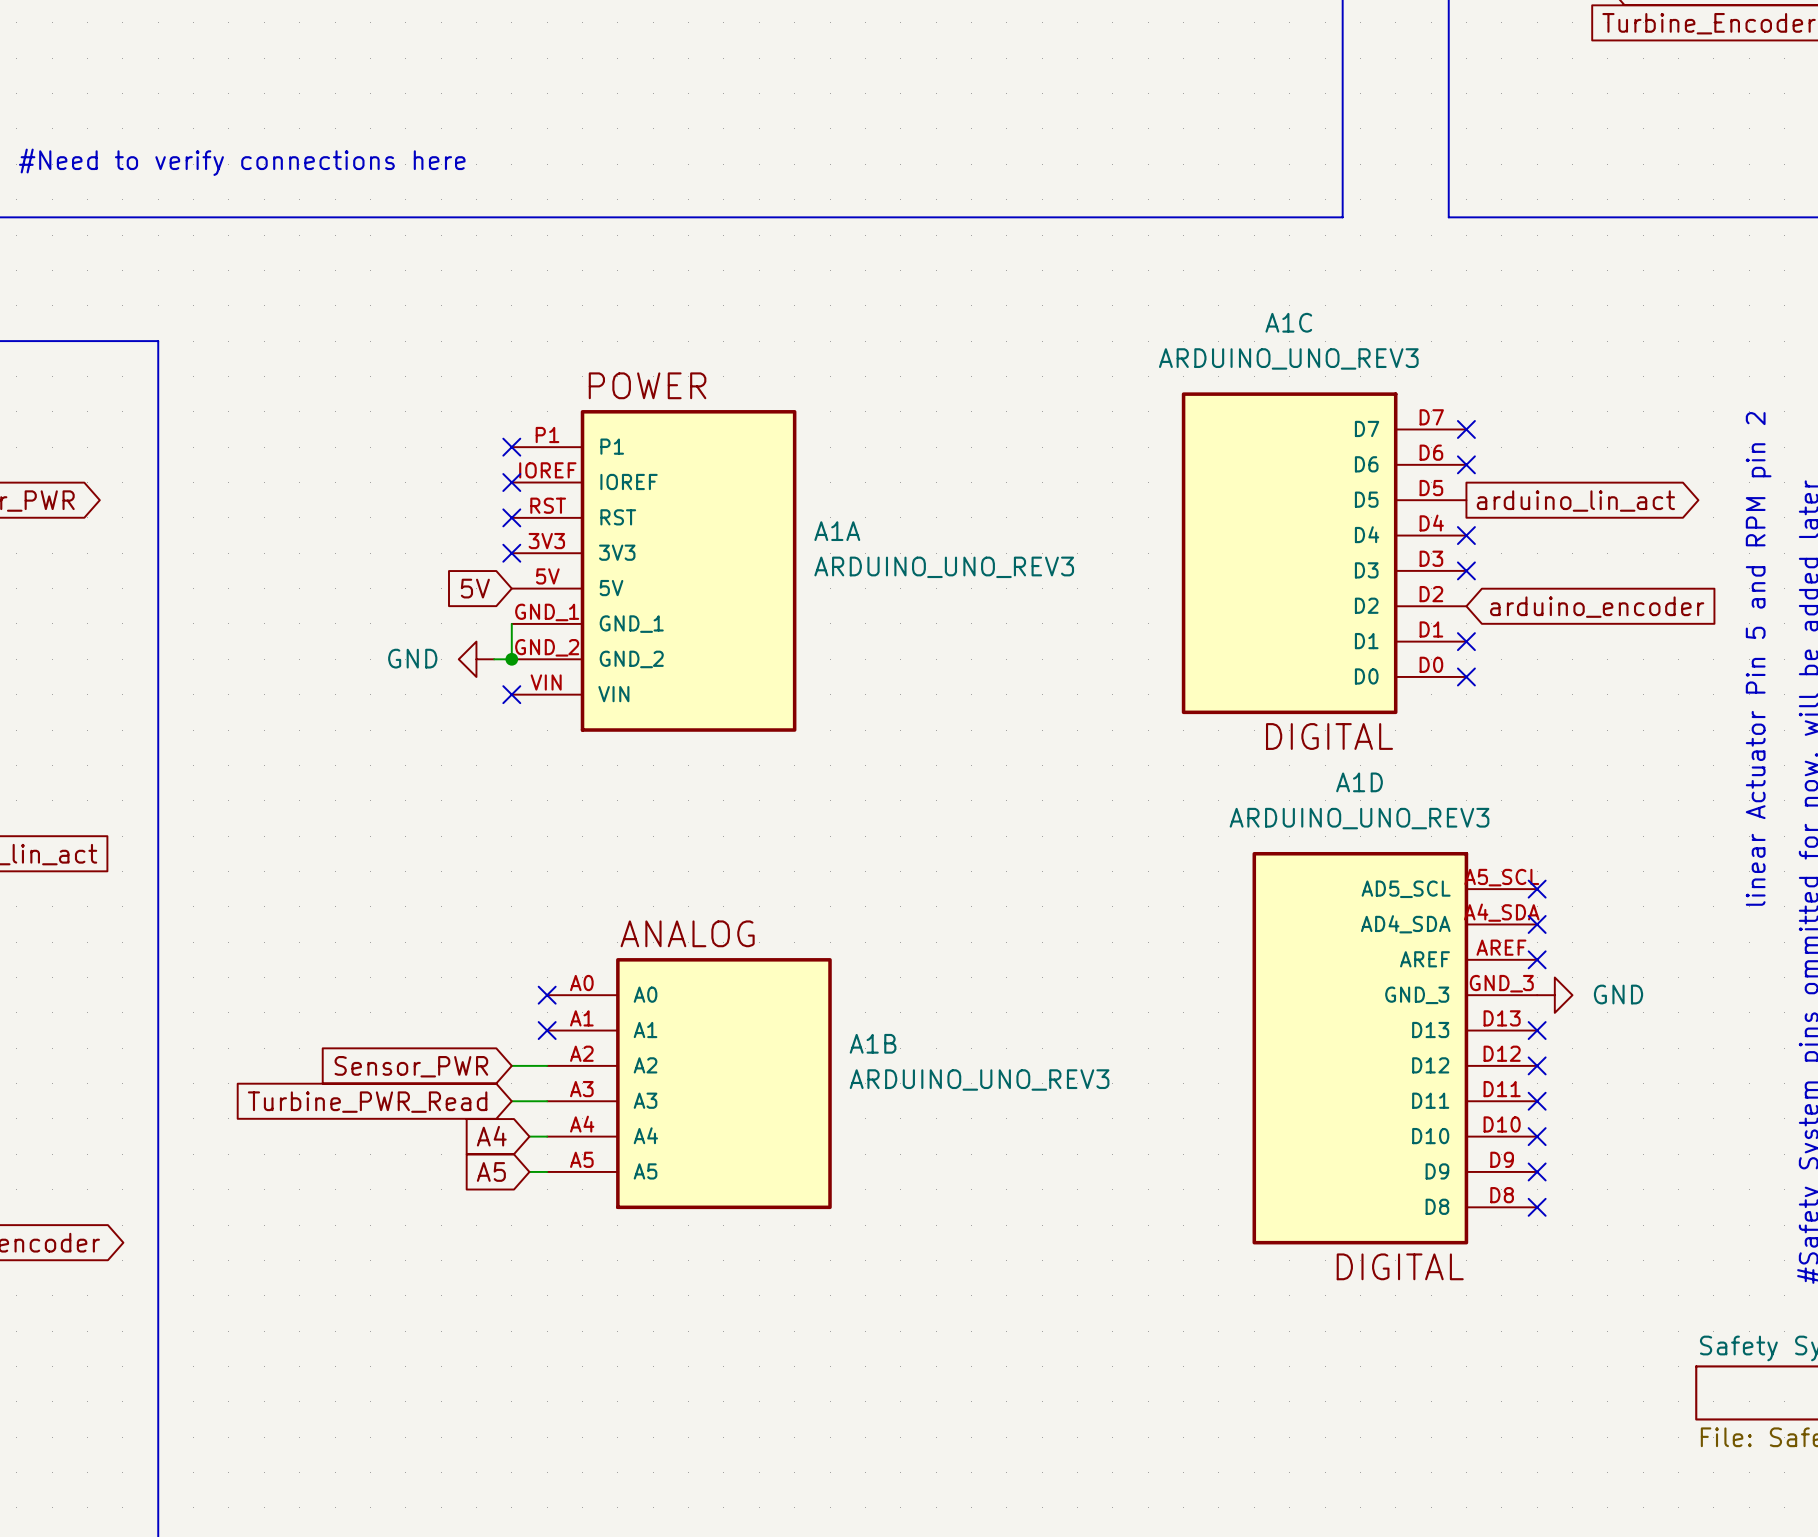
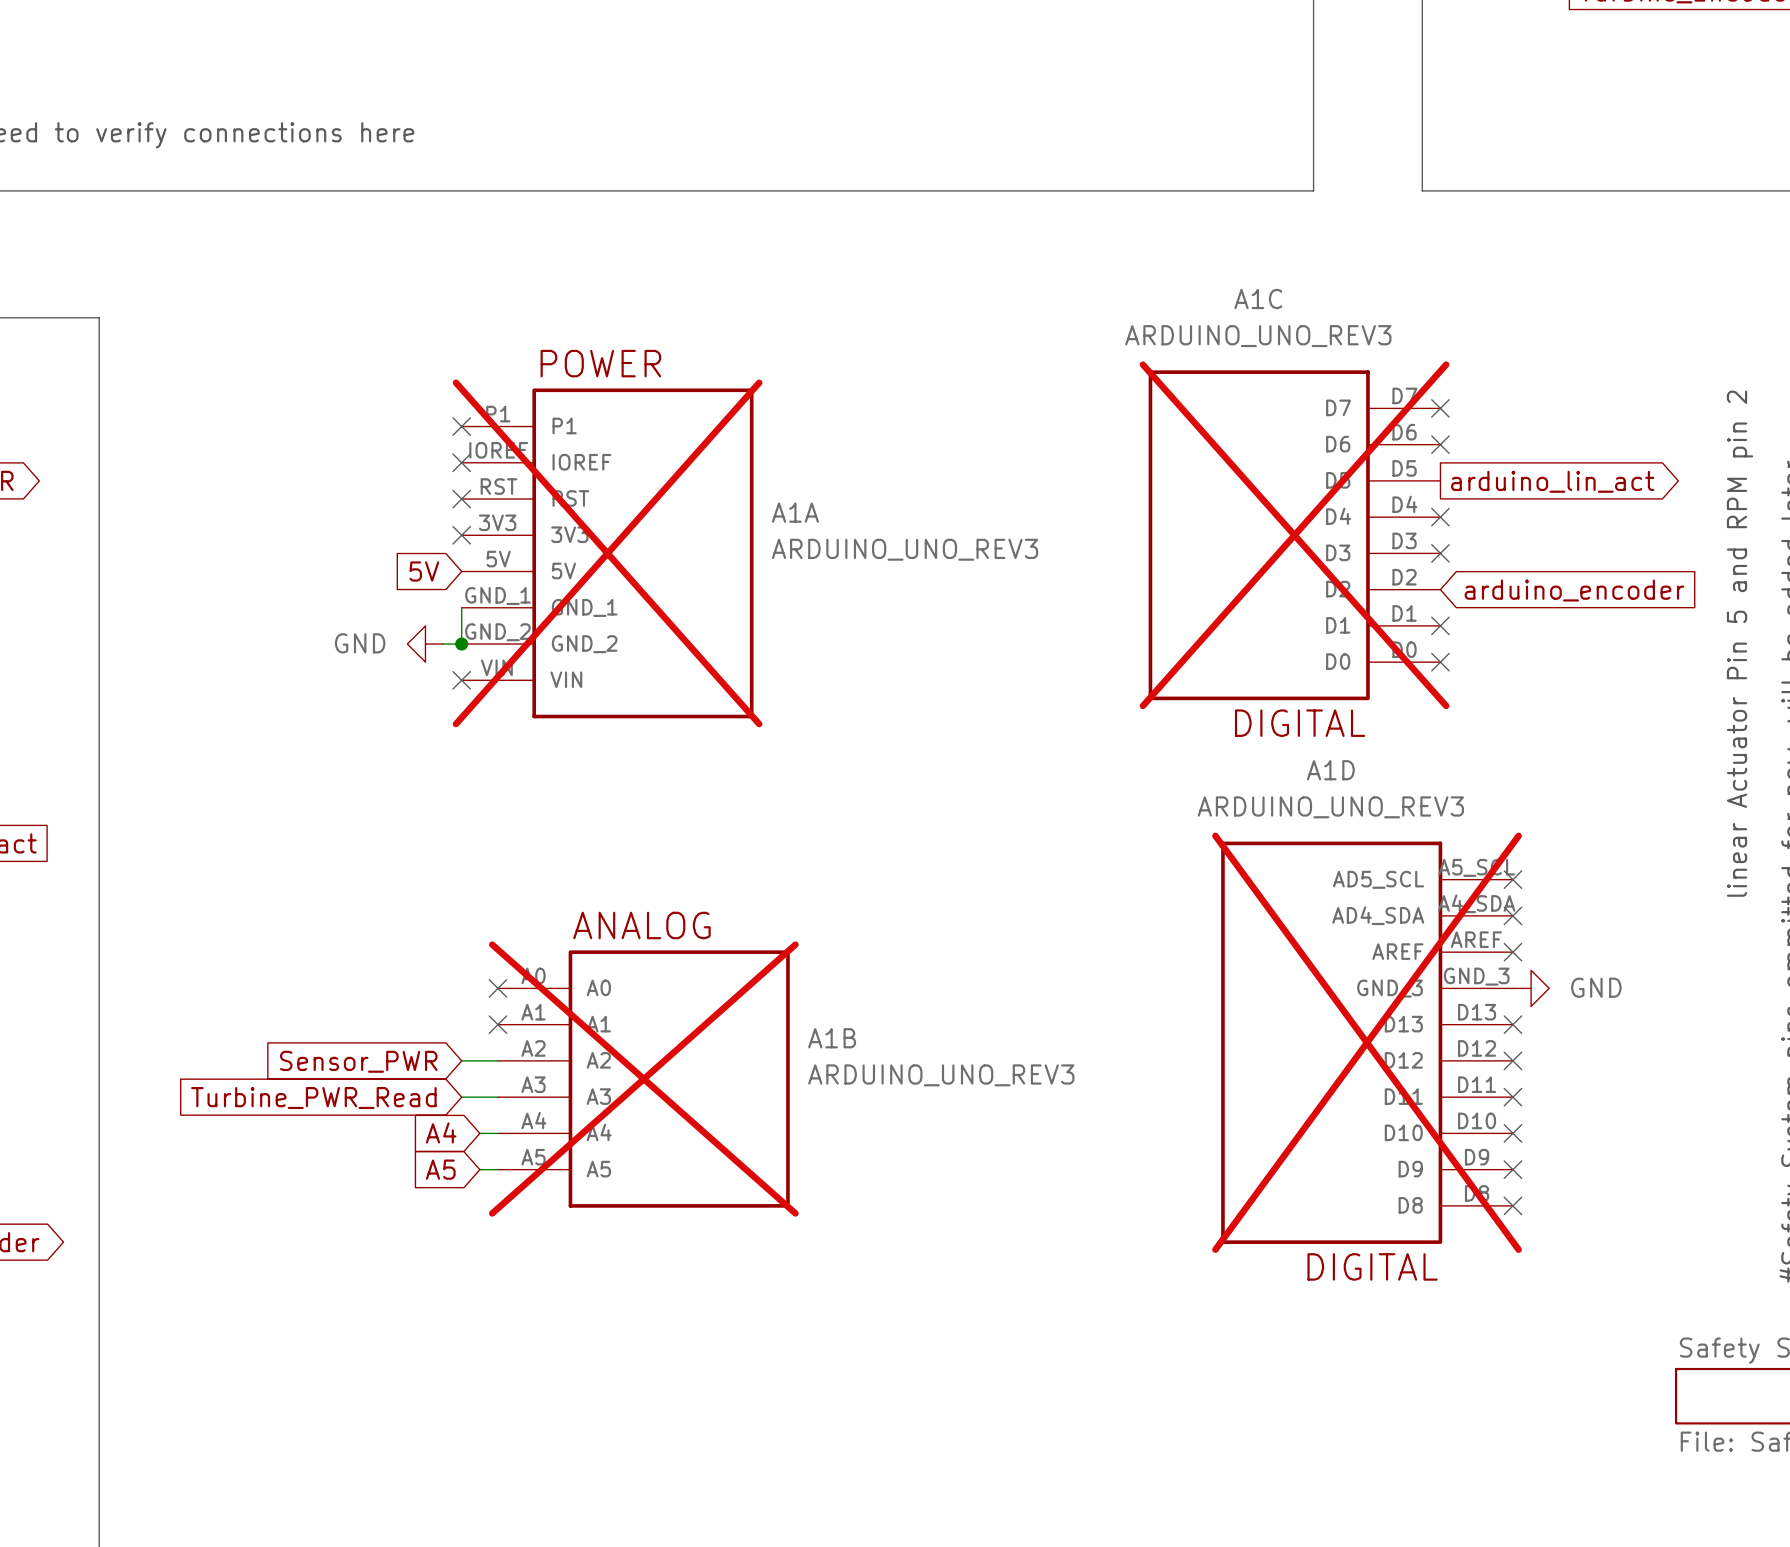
A1C do-not-place cross: none -> (1294, 535)
A1A do-not-place cross: none -> (607, 553)
A1D do-not-place cross: none -> (1367, 1042)
A1B do-not-place cross: none -> (643, 1079)

